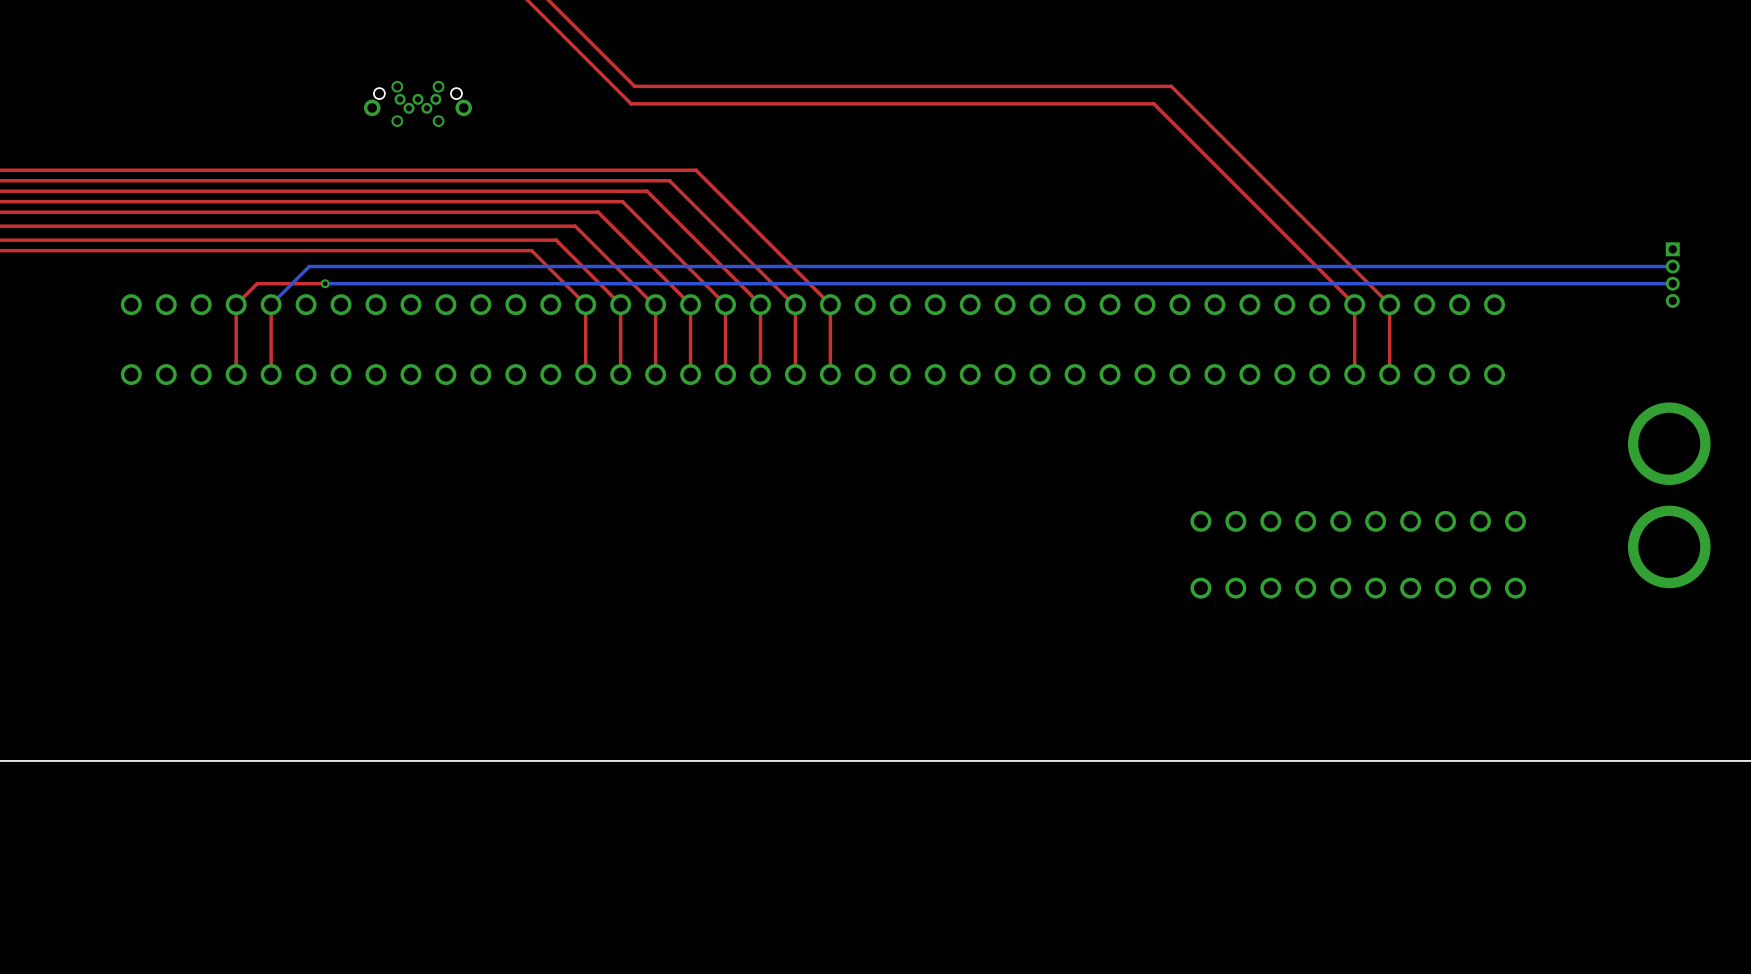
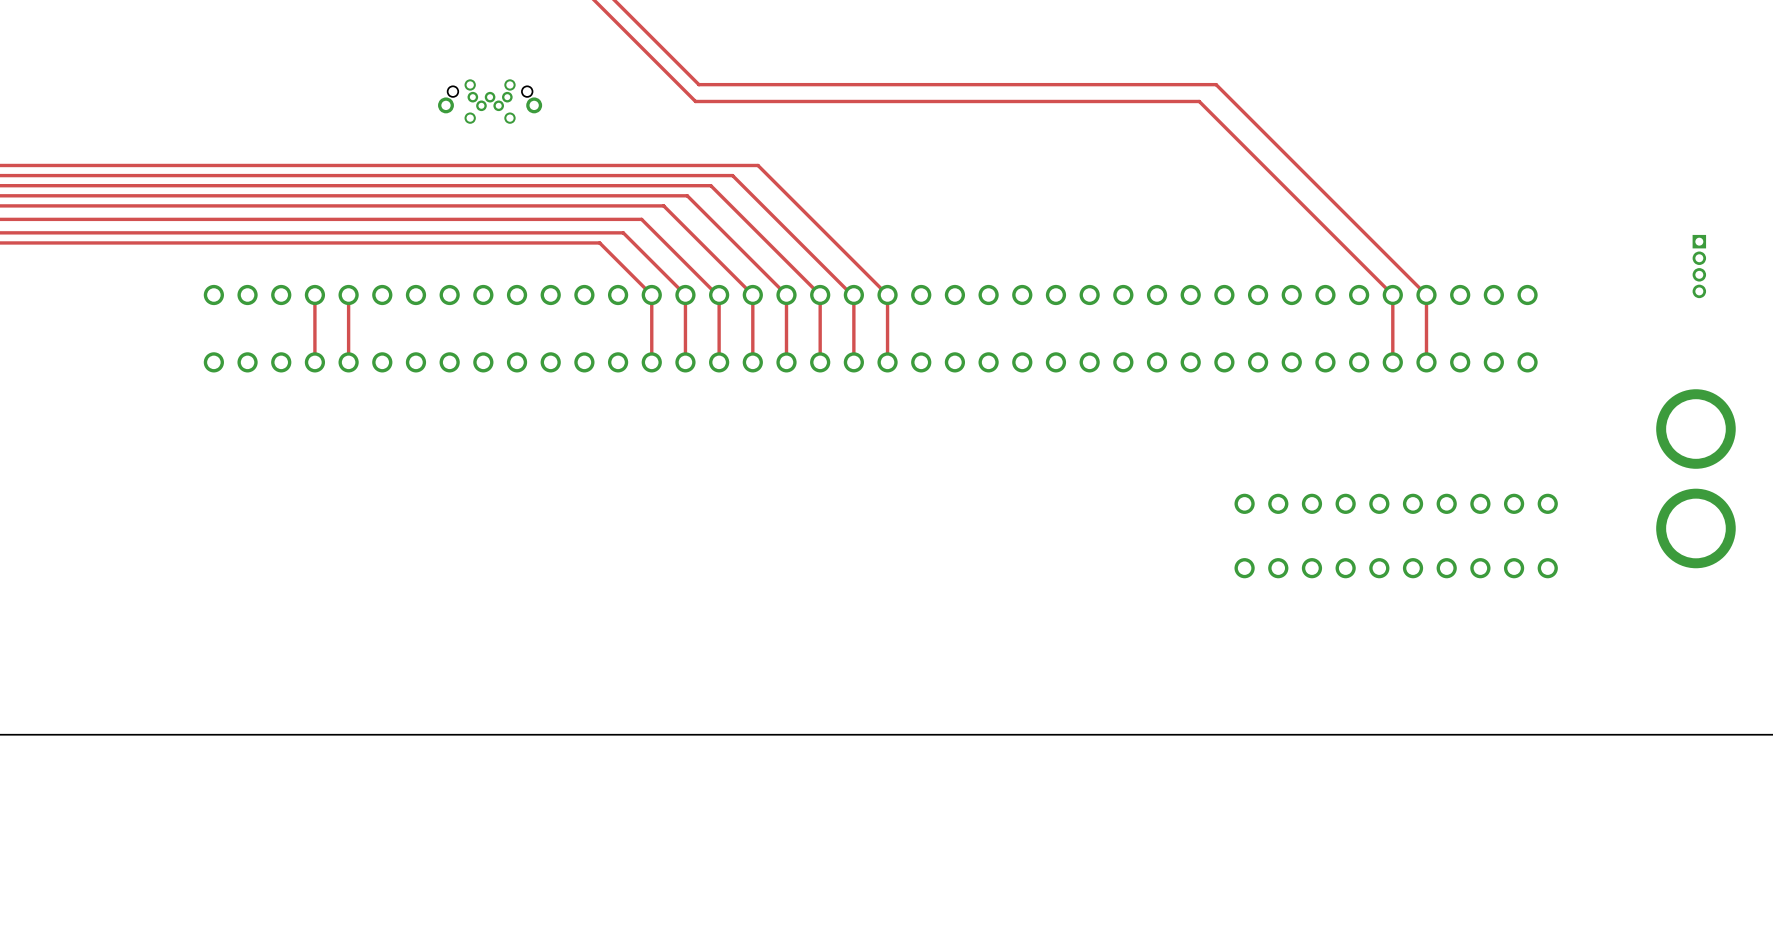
bottom track: (1672, 266) (309, 266) (271, 304) -> none
top track: (325, 283) (257, 283) (236, 304) -> none
via: (325, 283) -> none
bottom track: (1672, 283) (325, 283) -> none

